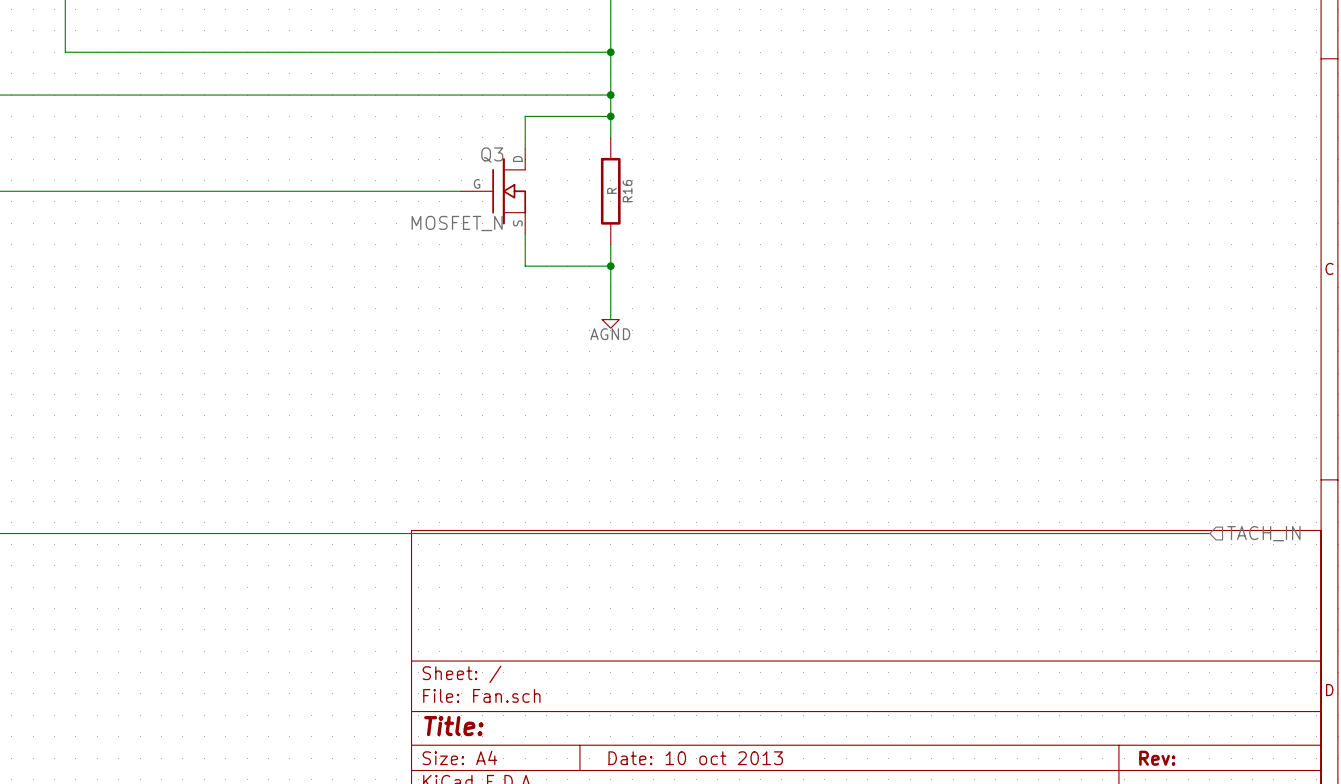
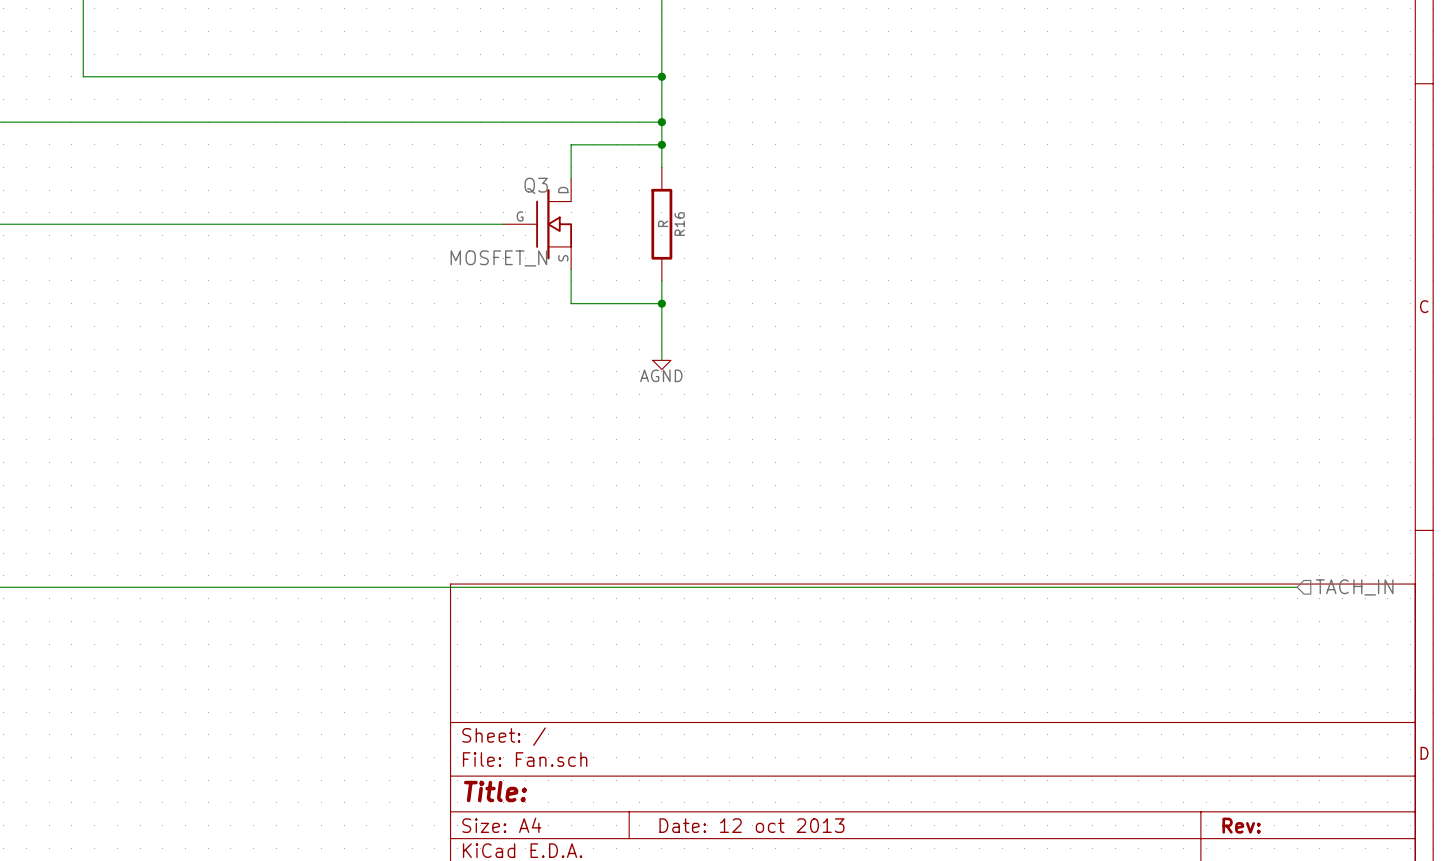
title block: Date: 10 oct 2013 (695, 758) -> Date: 12 oct 2013 (751, 825)

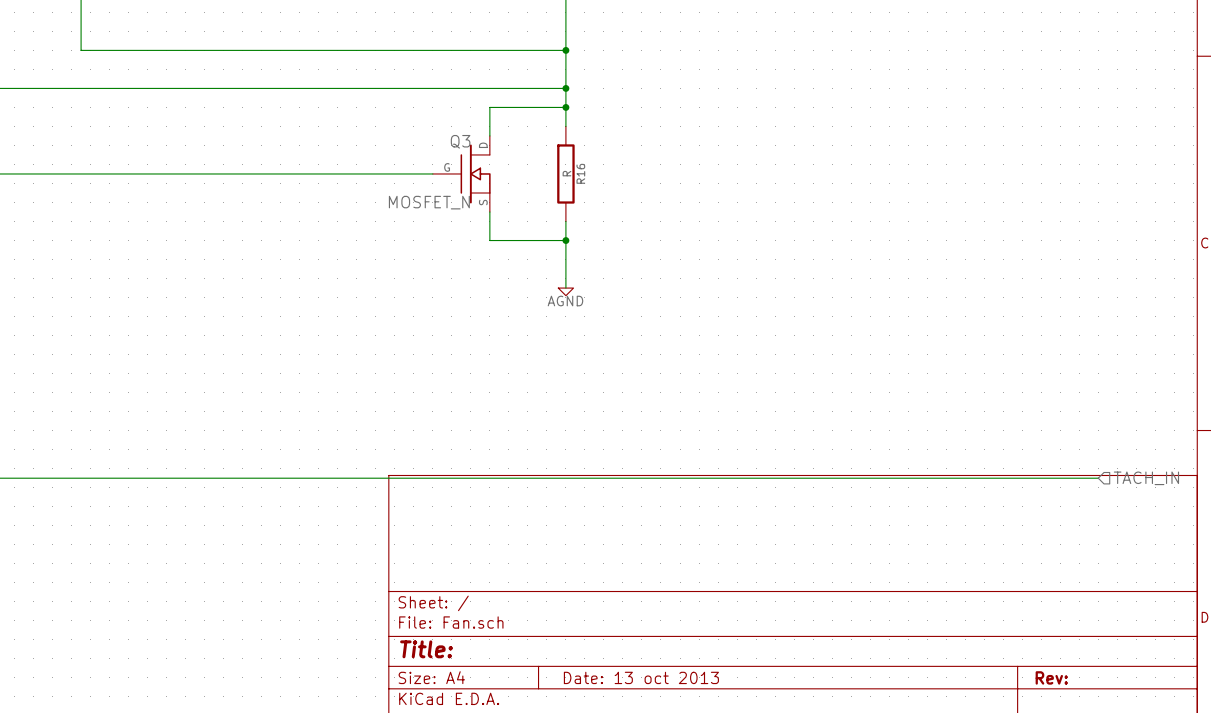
title block: Date: 12 oct 2013 (751, 825) -> Date: 13 oct 2013 (641, 677)

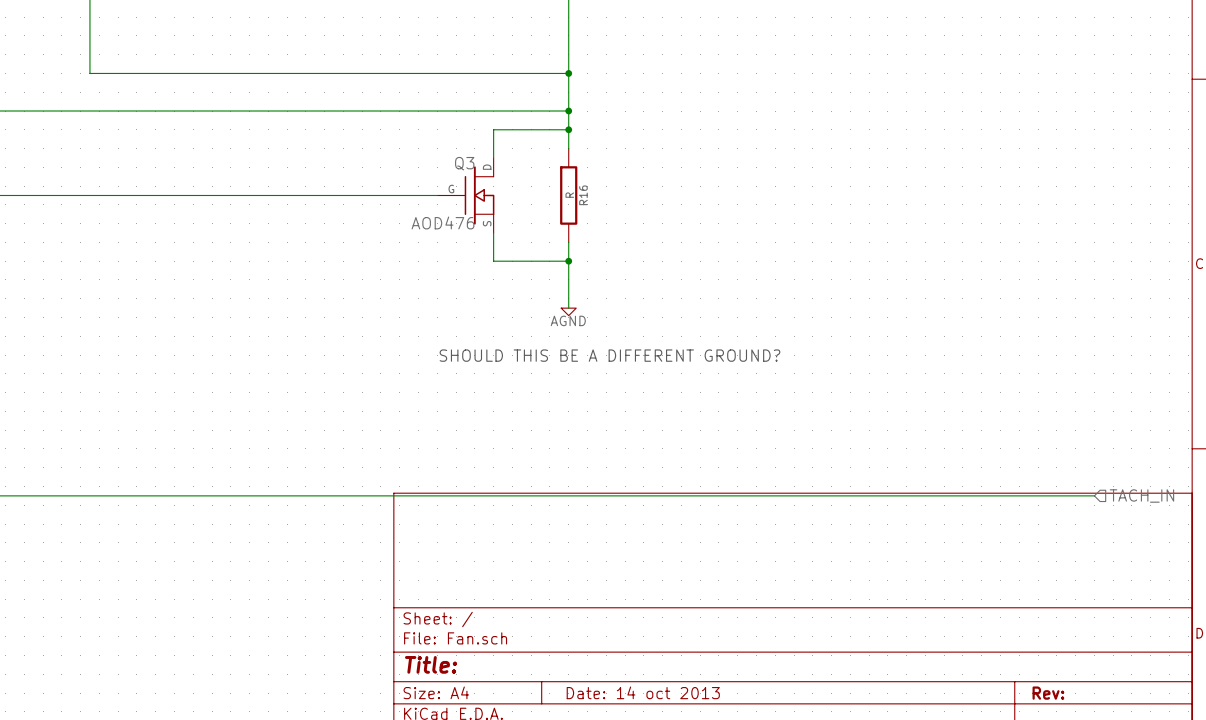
Q3 value: MOSFET_N (429, 202) -> AOD476 (442, 222)
text: none -> SHOULD THIS BE A DIFFERENT GROUND? (609, 355)
title block: Date: 13 oct 2013 (641, 677) -> Date: 14 oct 2013 (643, 692)

